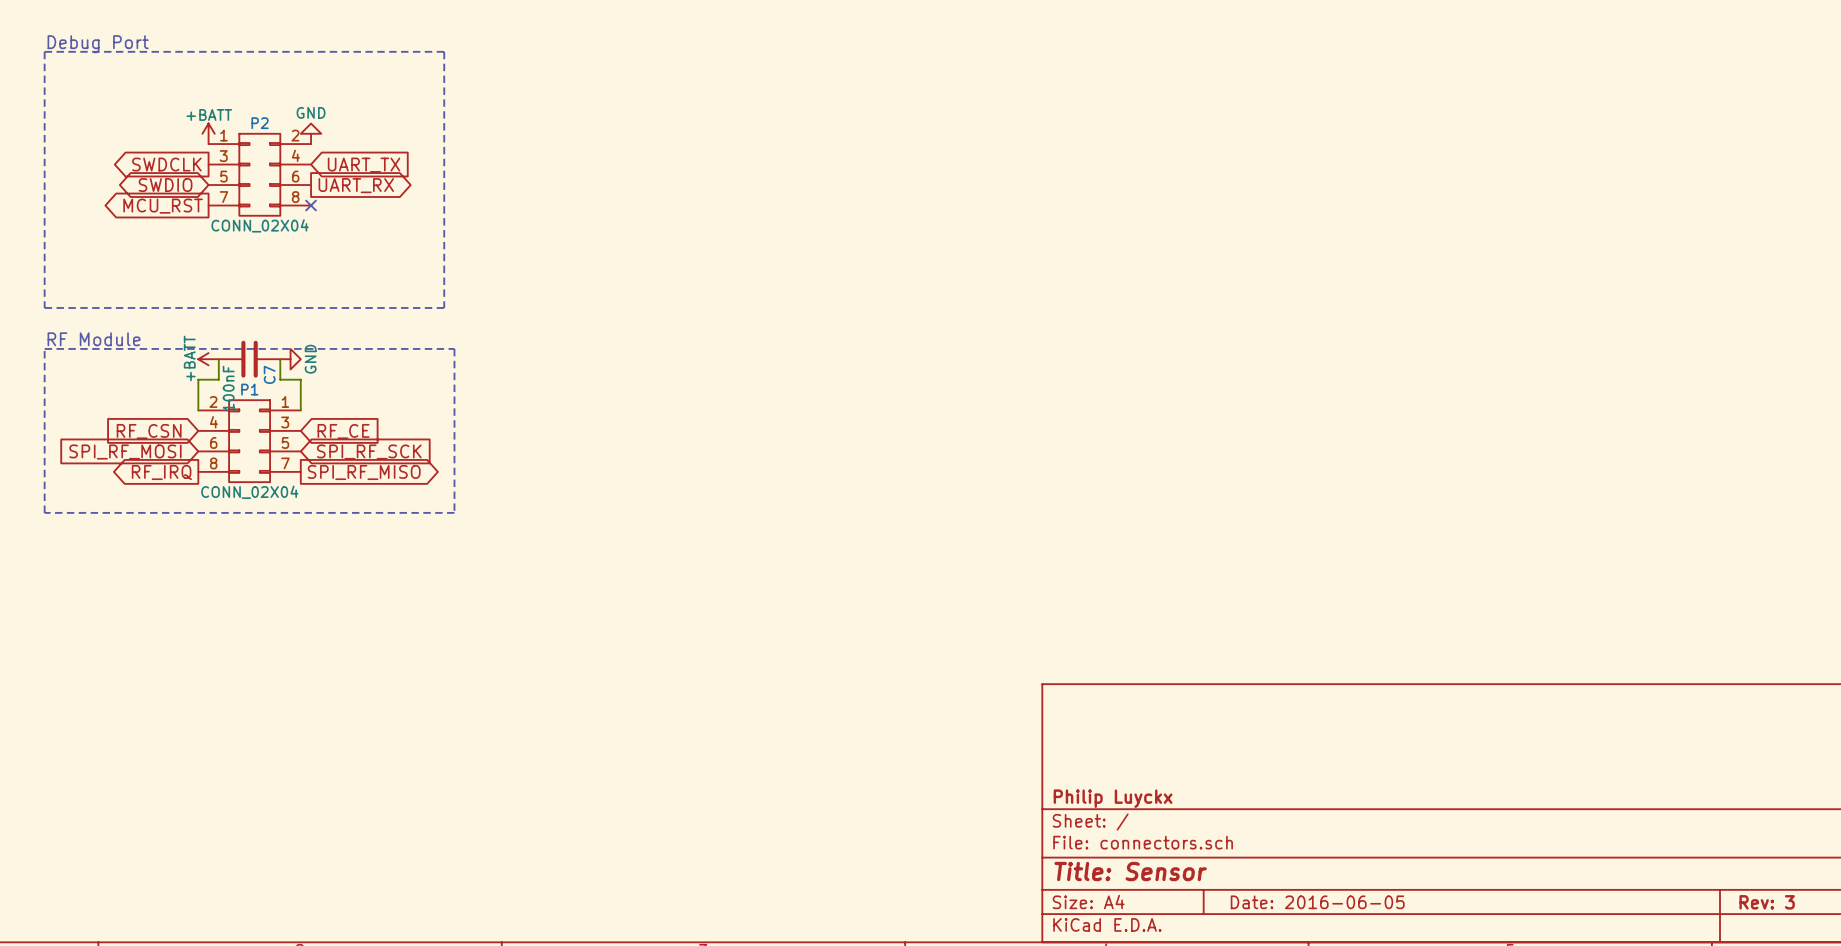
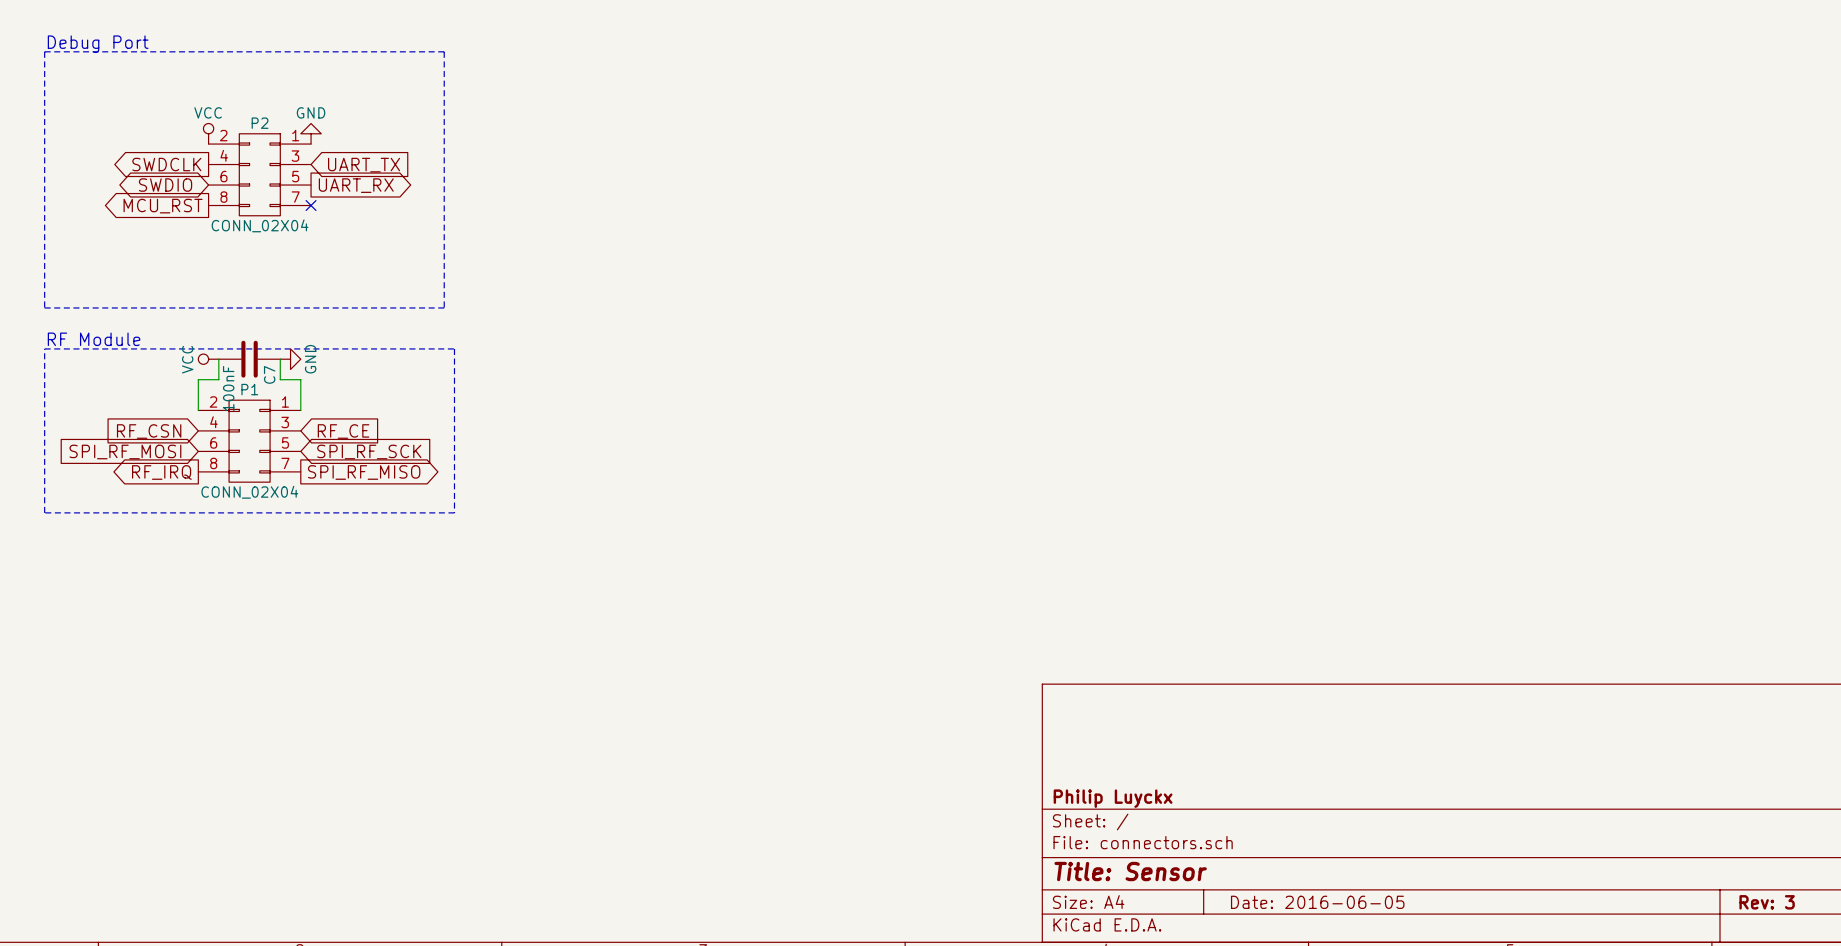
power symbol: +BATT (208, 133) -> VCC (208, 133)
P2 flip: as is (259, 174) -> left-right (259, 174)
power symbol: +BATT (208, 359) -> VCC (208, 359)

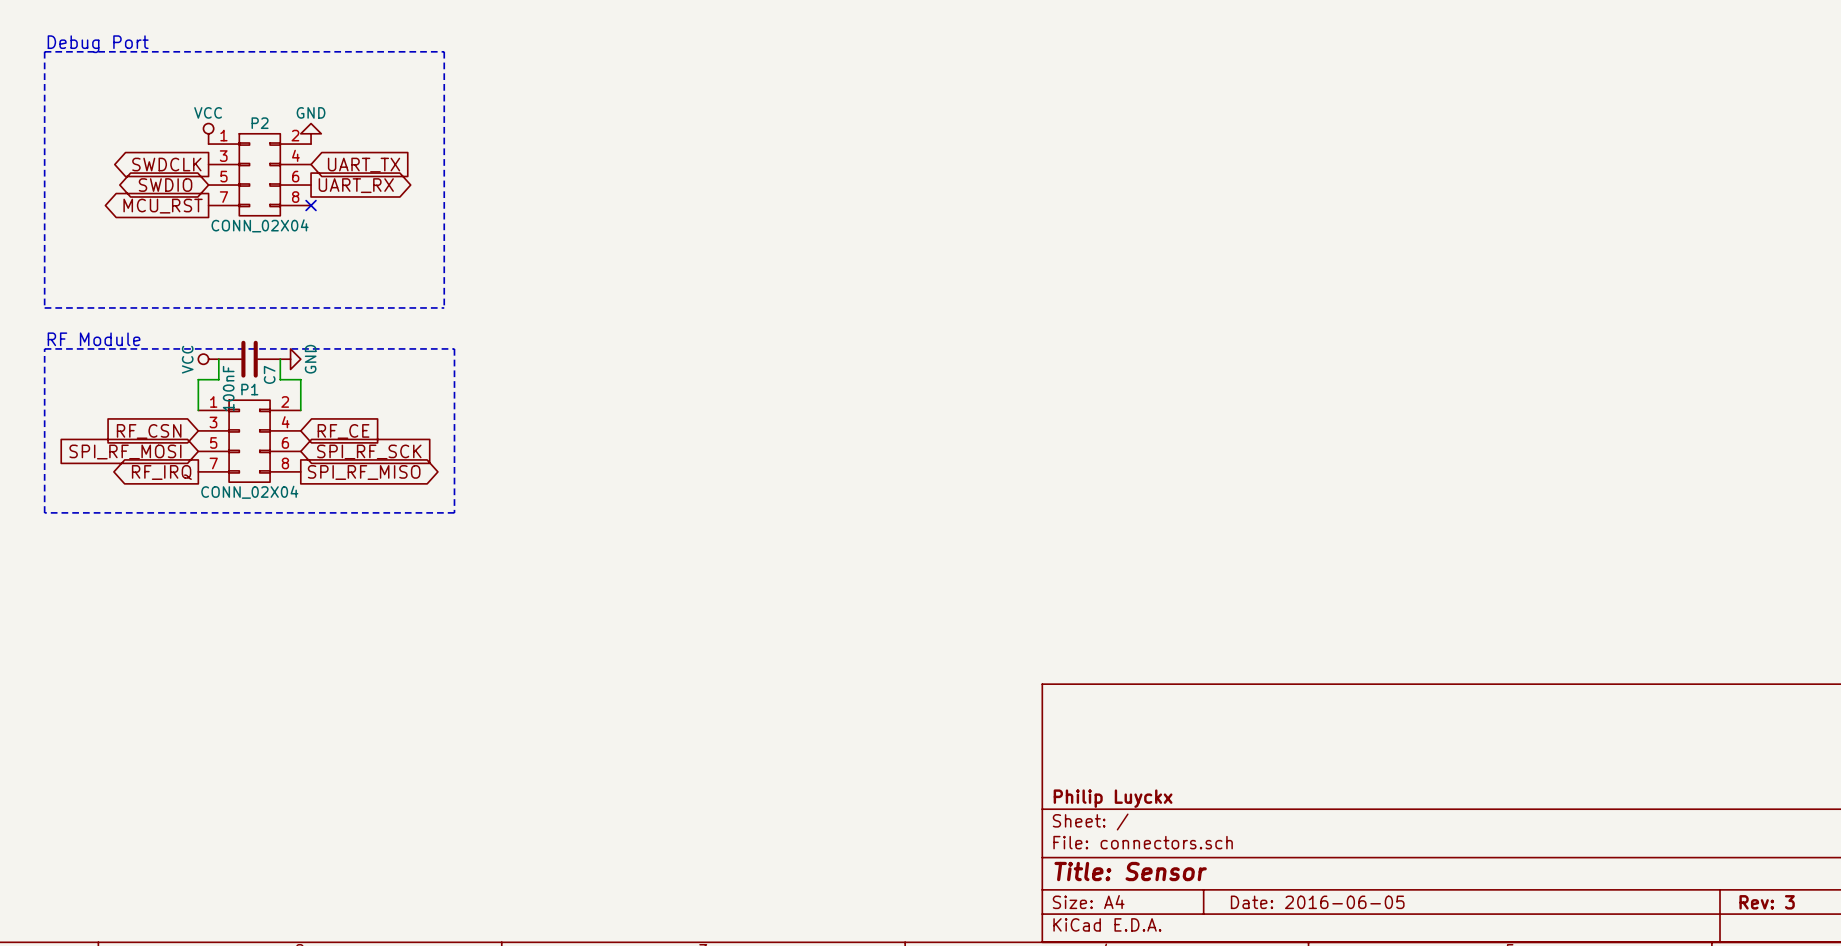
P2 flip: as is (259, 174) -> left-right (259, 174)
P1 flip: as is (249, 441) -> left-right (249, 441)

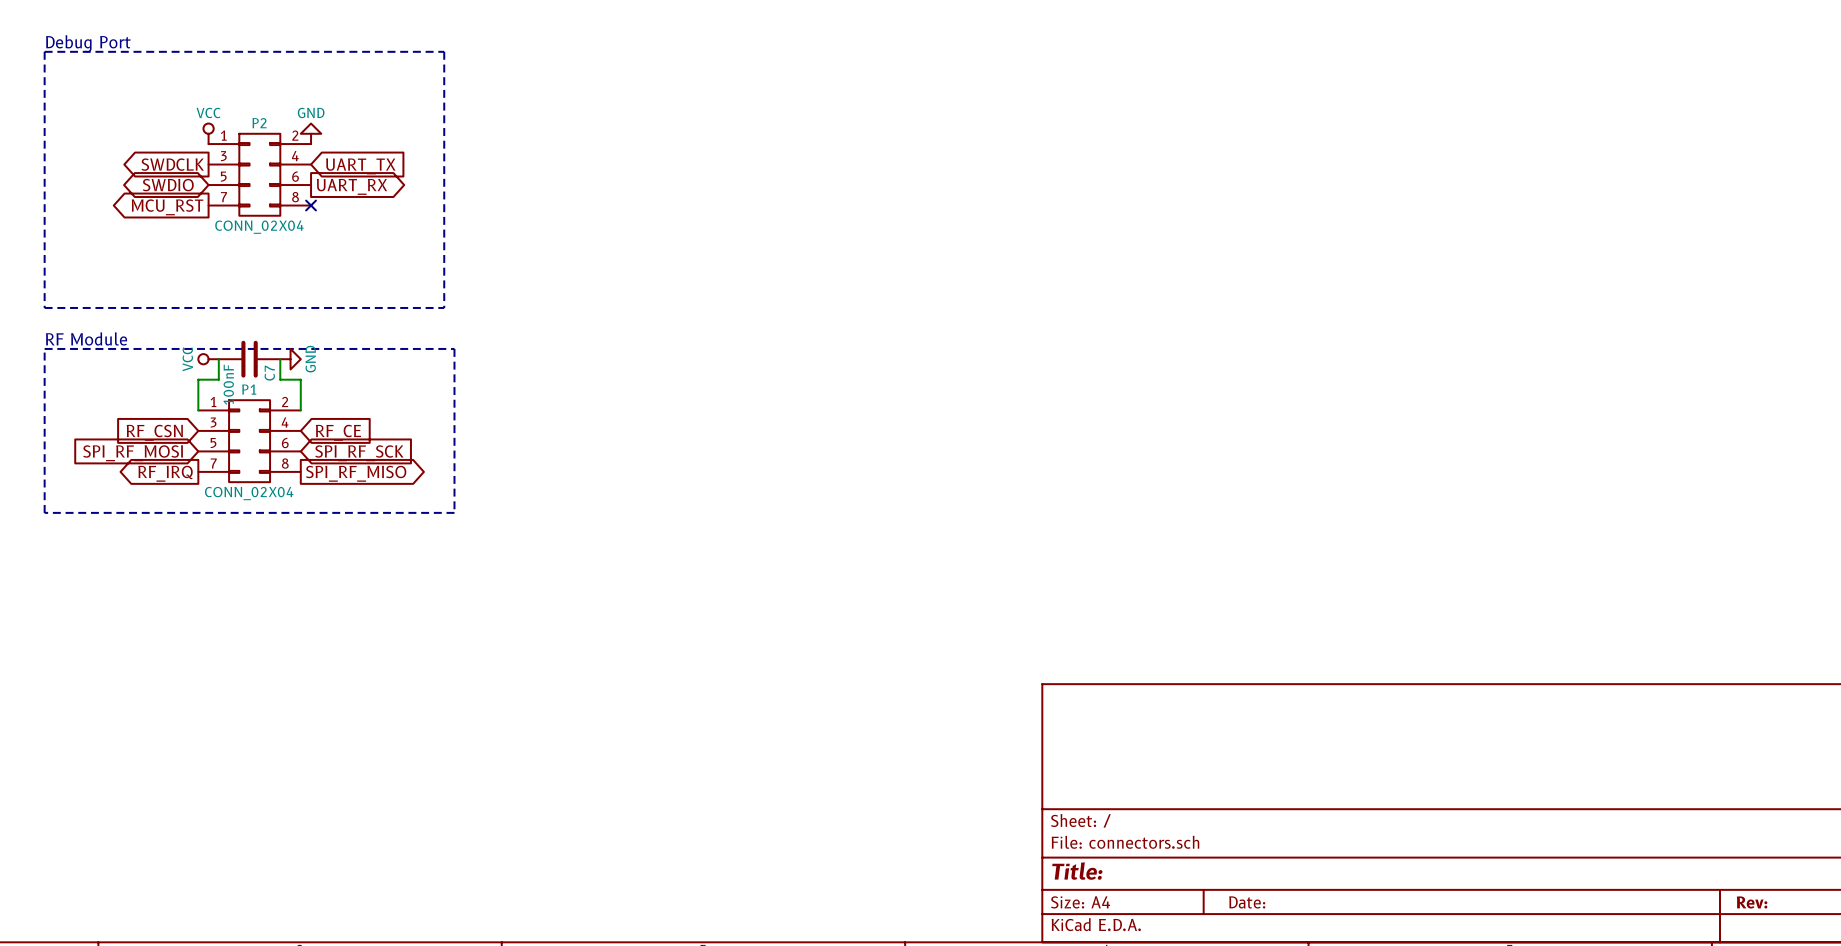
title block: Philip Luyckx (1113, 798) -> none
title block: Title: Sensor (1130, 871) -> Title: (1077, 871)
title block: Date: 2016-06-05 (1317, 902) -> Date: (1247, 902)
title block: Rev: 3 (1767, 902) -> Rev: (1752, 902)

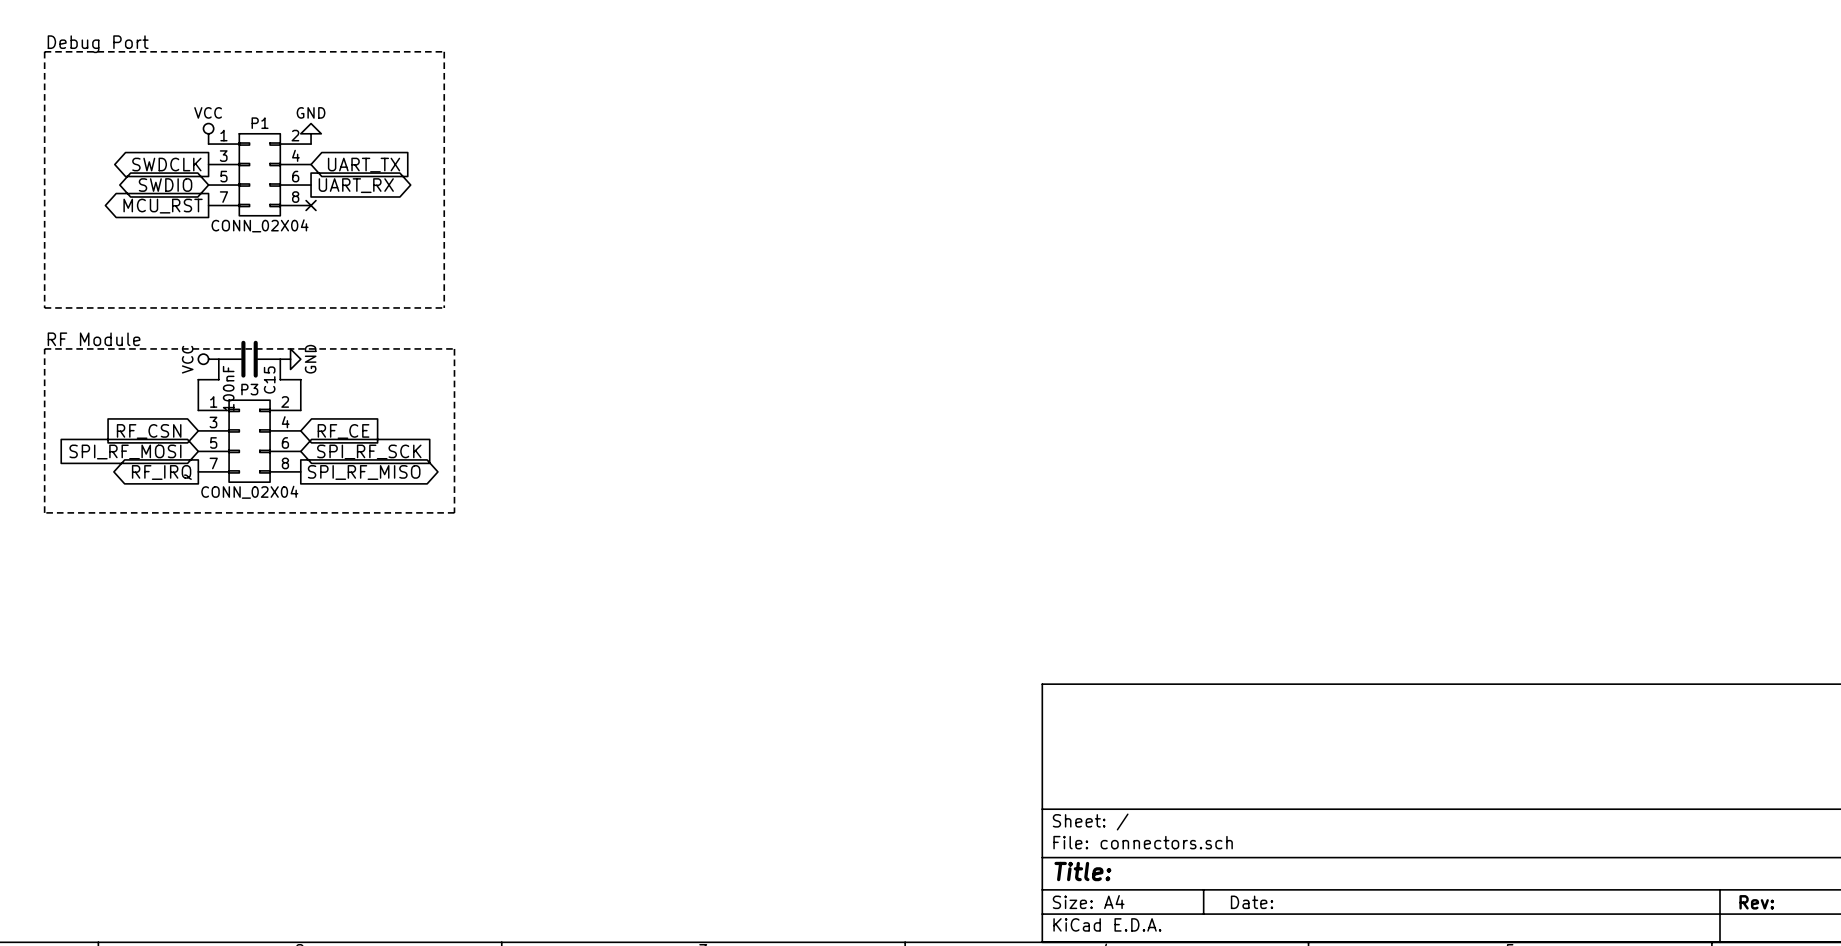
P2 name: P2 (259, 123) -> P1 (260, 123)
C7 name: C7 (269, 373) -> C15 (269, 380)
P1 name: P1 (249, 389) -> P3 (249, 389)

